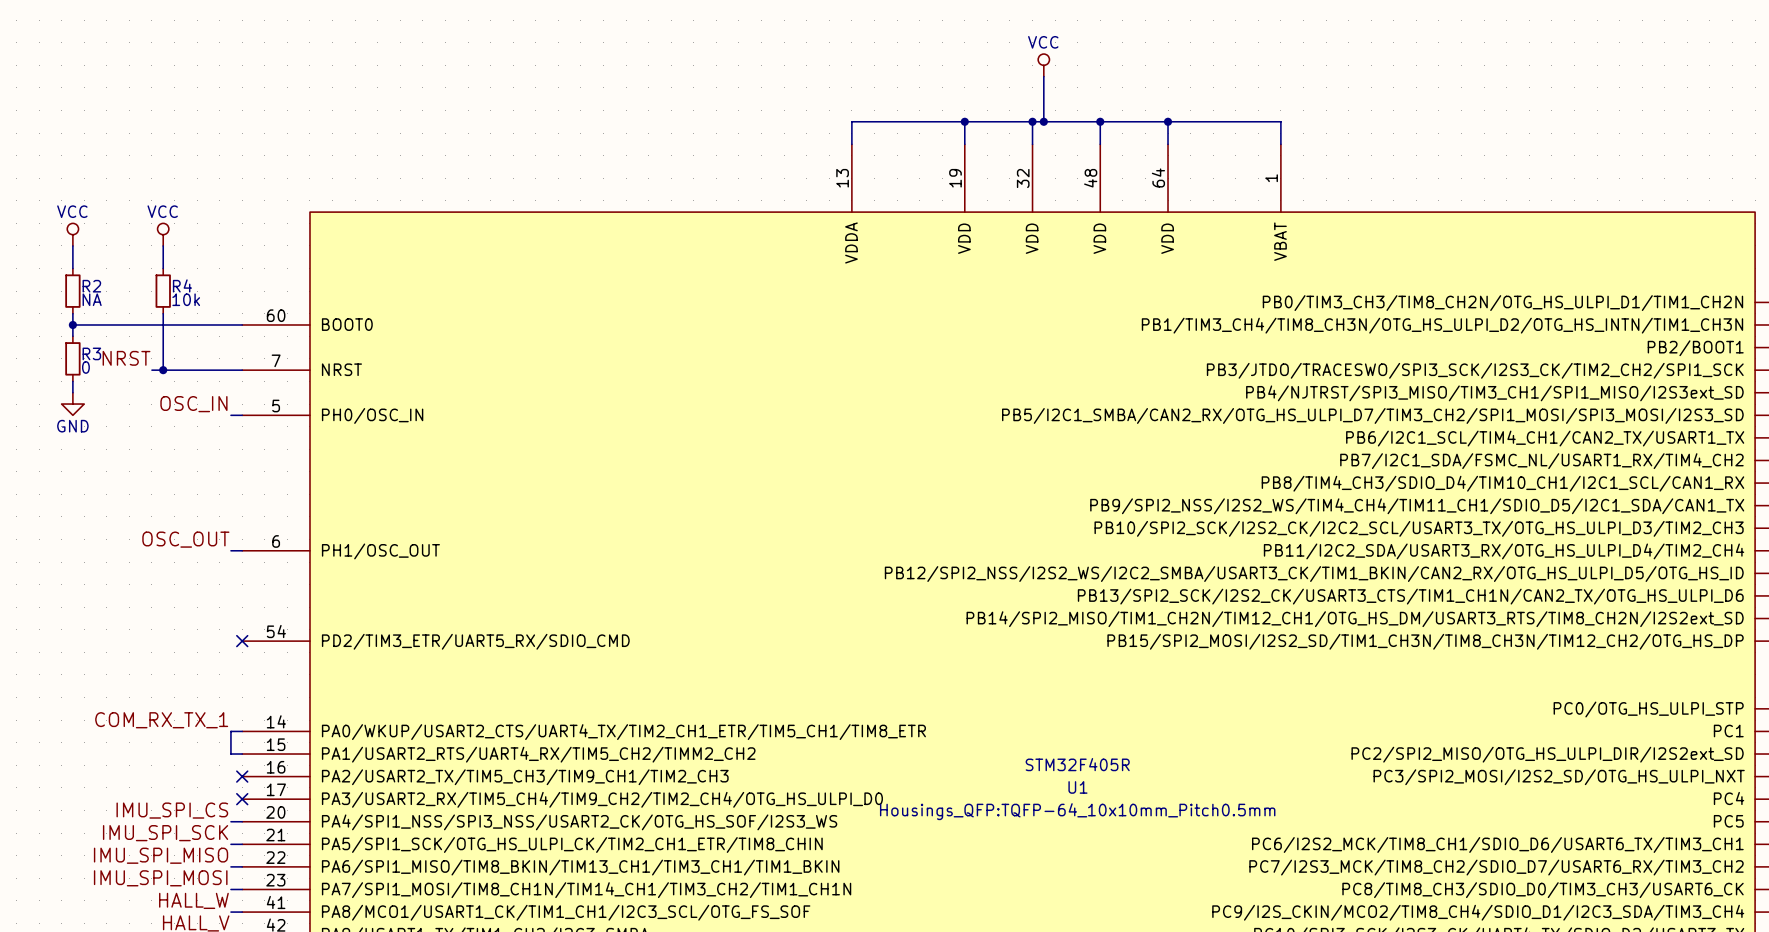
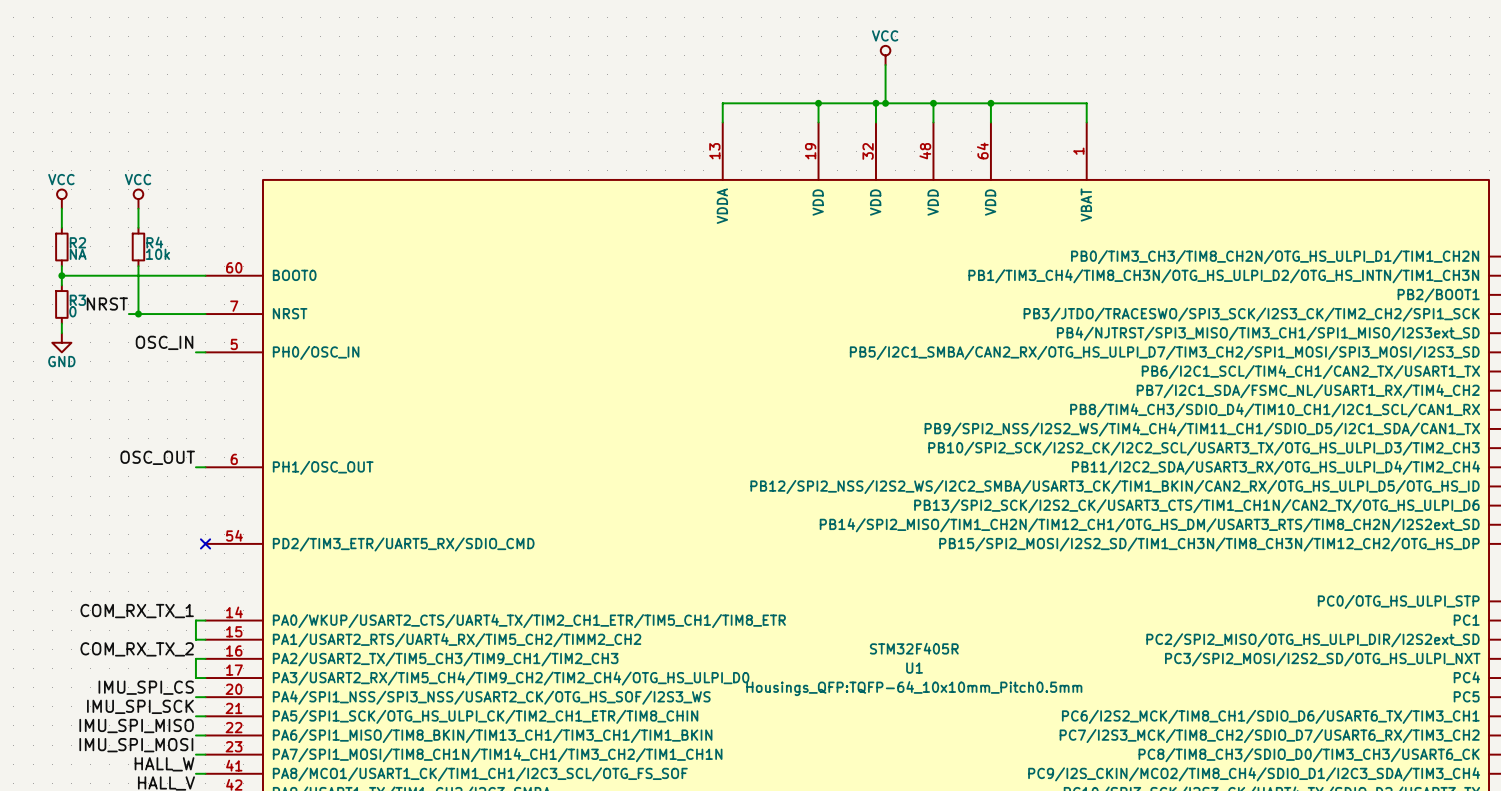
label: none -> COM_RX_TX_2 (137, 649)
wire: none -> (205, 658) (195, 658) (195, 678) (205, 678)
no-connect mark: (242, 776) -> none
no-connect mark: (242, 799) -> none

